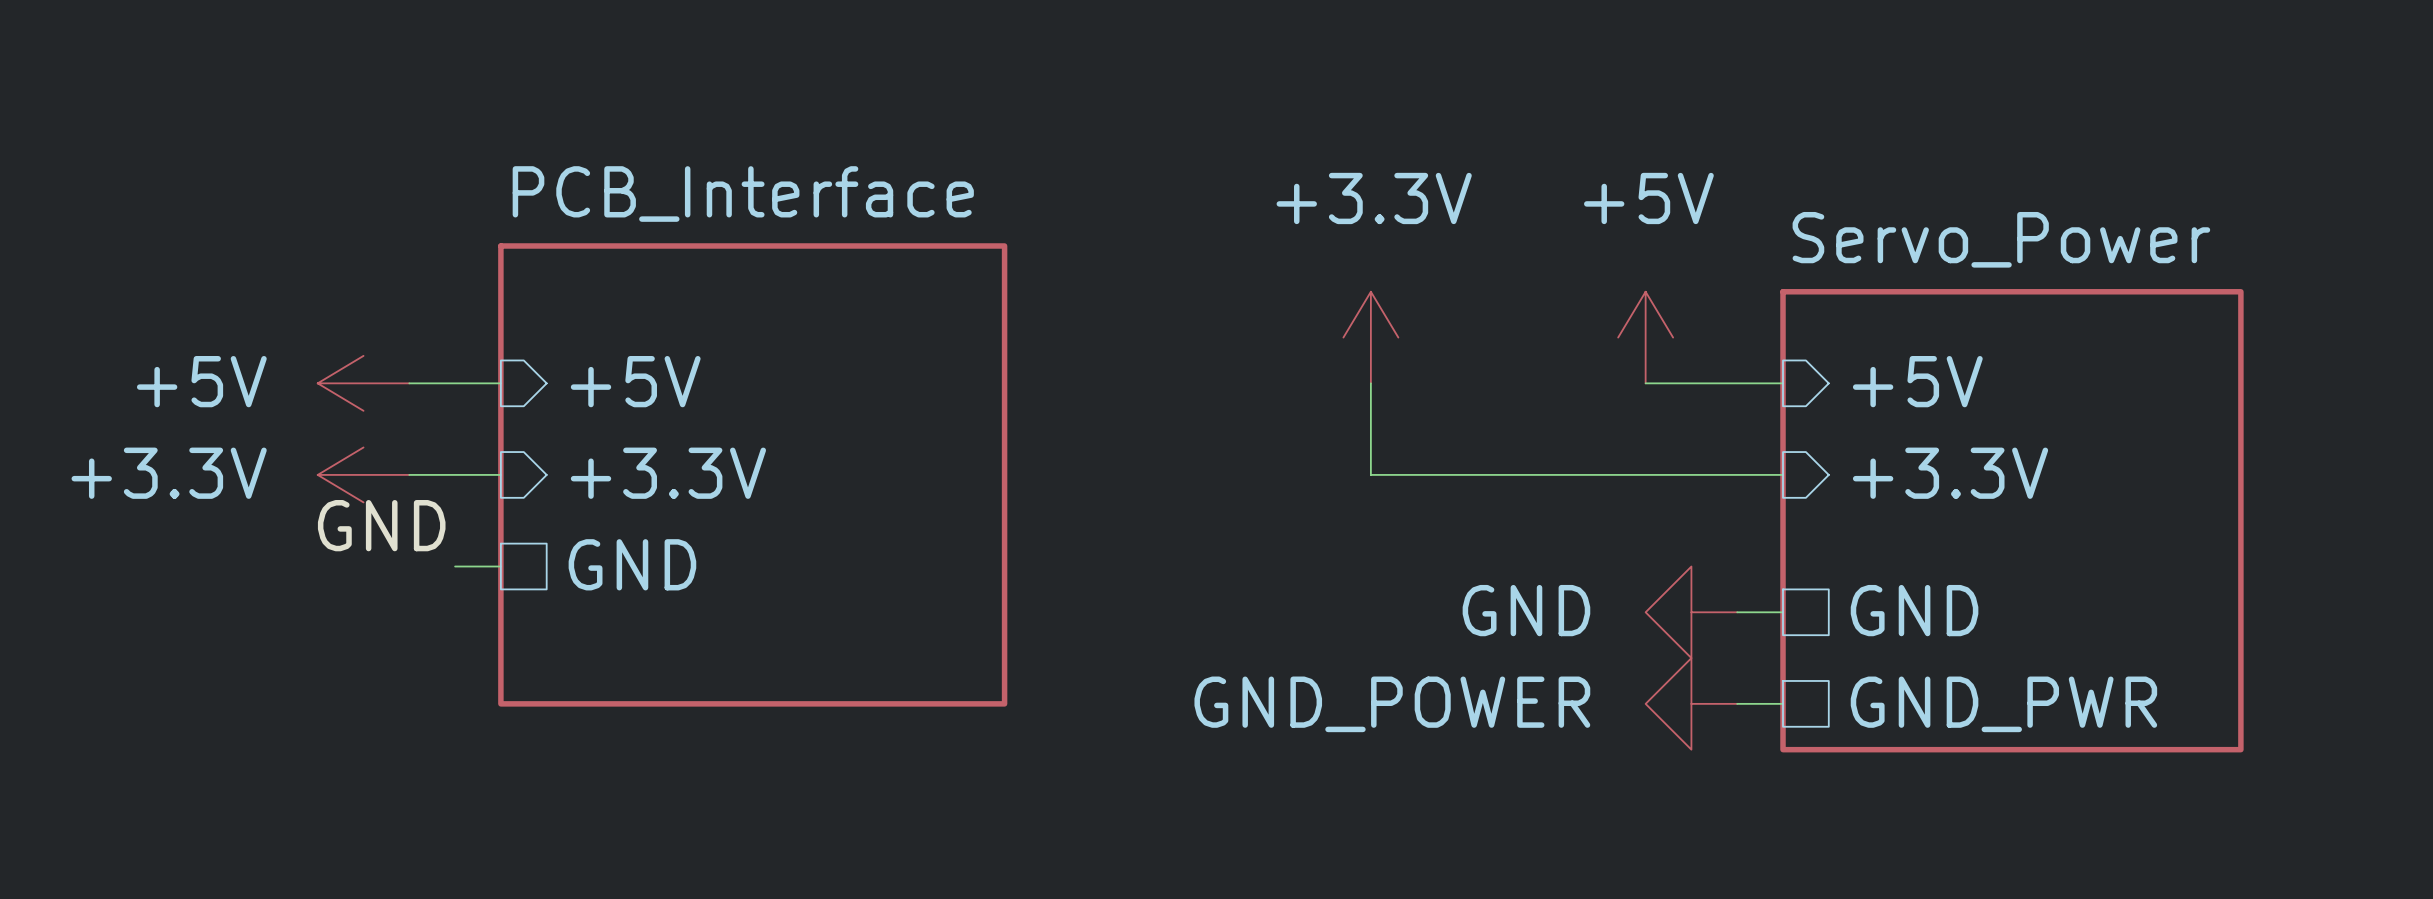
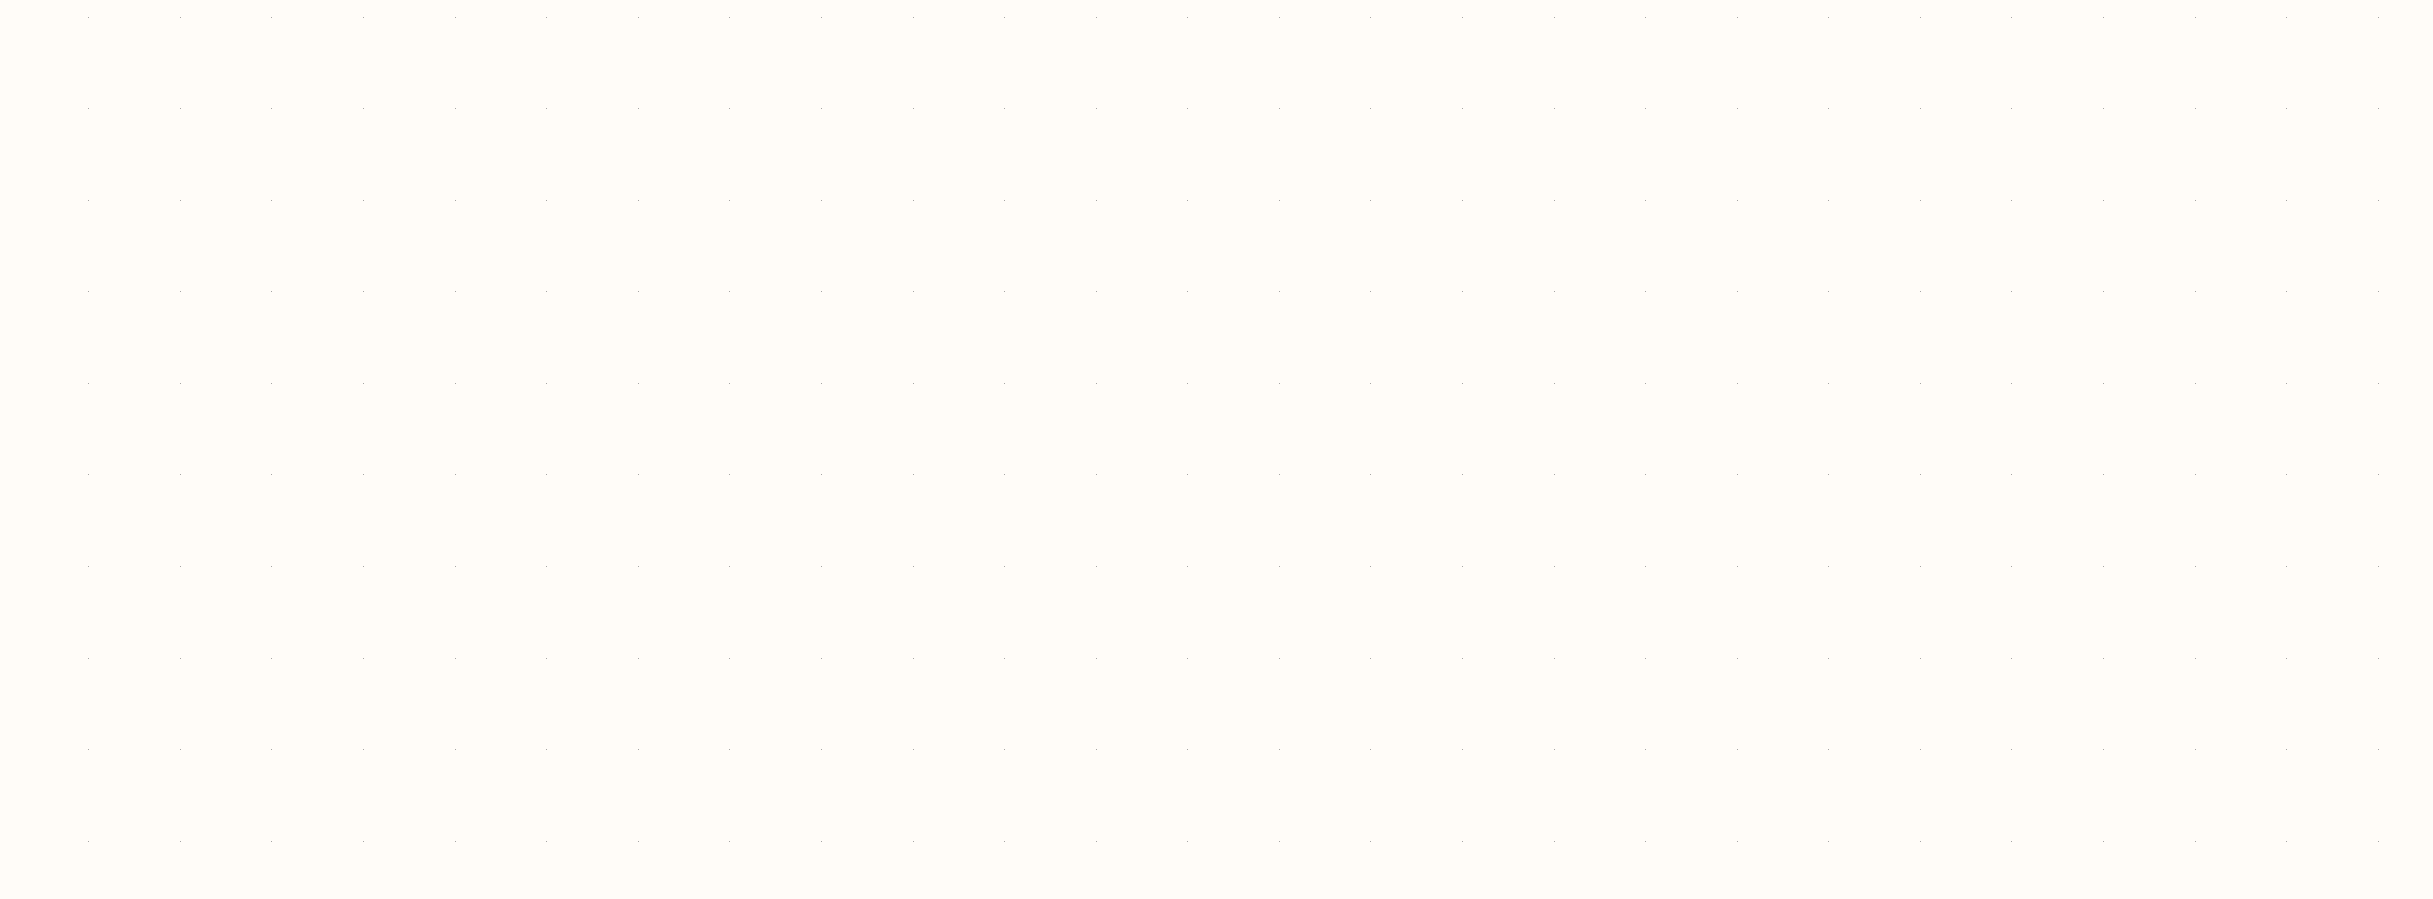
power symbol: +3.3V (1370, 337) -> none
power symbol: +5V (1645, 337) -> none
sheet pin: +5V (635, 381) -> none
sheet pin: +5V (1917, 381) -> none
power symbol: +5V (363, 383) -> none
wire: (409, 383) (500, 383) -> none
wire: (1370, 383) (1370, 474) (1783, 474) -> none
wire: (1645, 383) (1783, 383) -> none
sheet pin: +3.3V (668, 473) -> none
sheet pin: +3.3V (1950, 473) -> none
power symbol: +3.3V (363, 474) -> none
wire: (409, 474) (500, 474) -> none
sheet PCB_Interface: (752, 474) -> none
sheet Servo_Power: (2011, 520) -> none
label: GND (381, 525) -> none
sheet pin: GND (632, 564) -> none
wire: (455, 566) (500, 566) -> none
sheet pin: GND (1914, 610) -> none
power symbol: GND (1691, 612) -> none
wire: (1737, 612) (1783, 612) -> none
power symbol: GND_POWER (1691, 703) -> none
wire: (1737, 703) (1783, 703) -> none
sheet pin: GND_PWR (2003, 704) -> none

